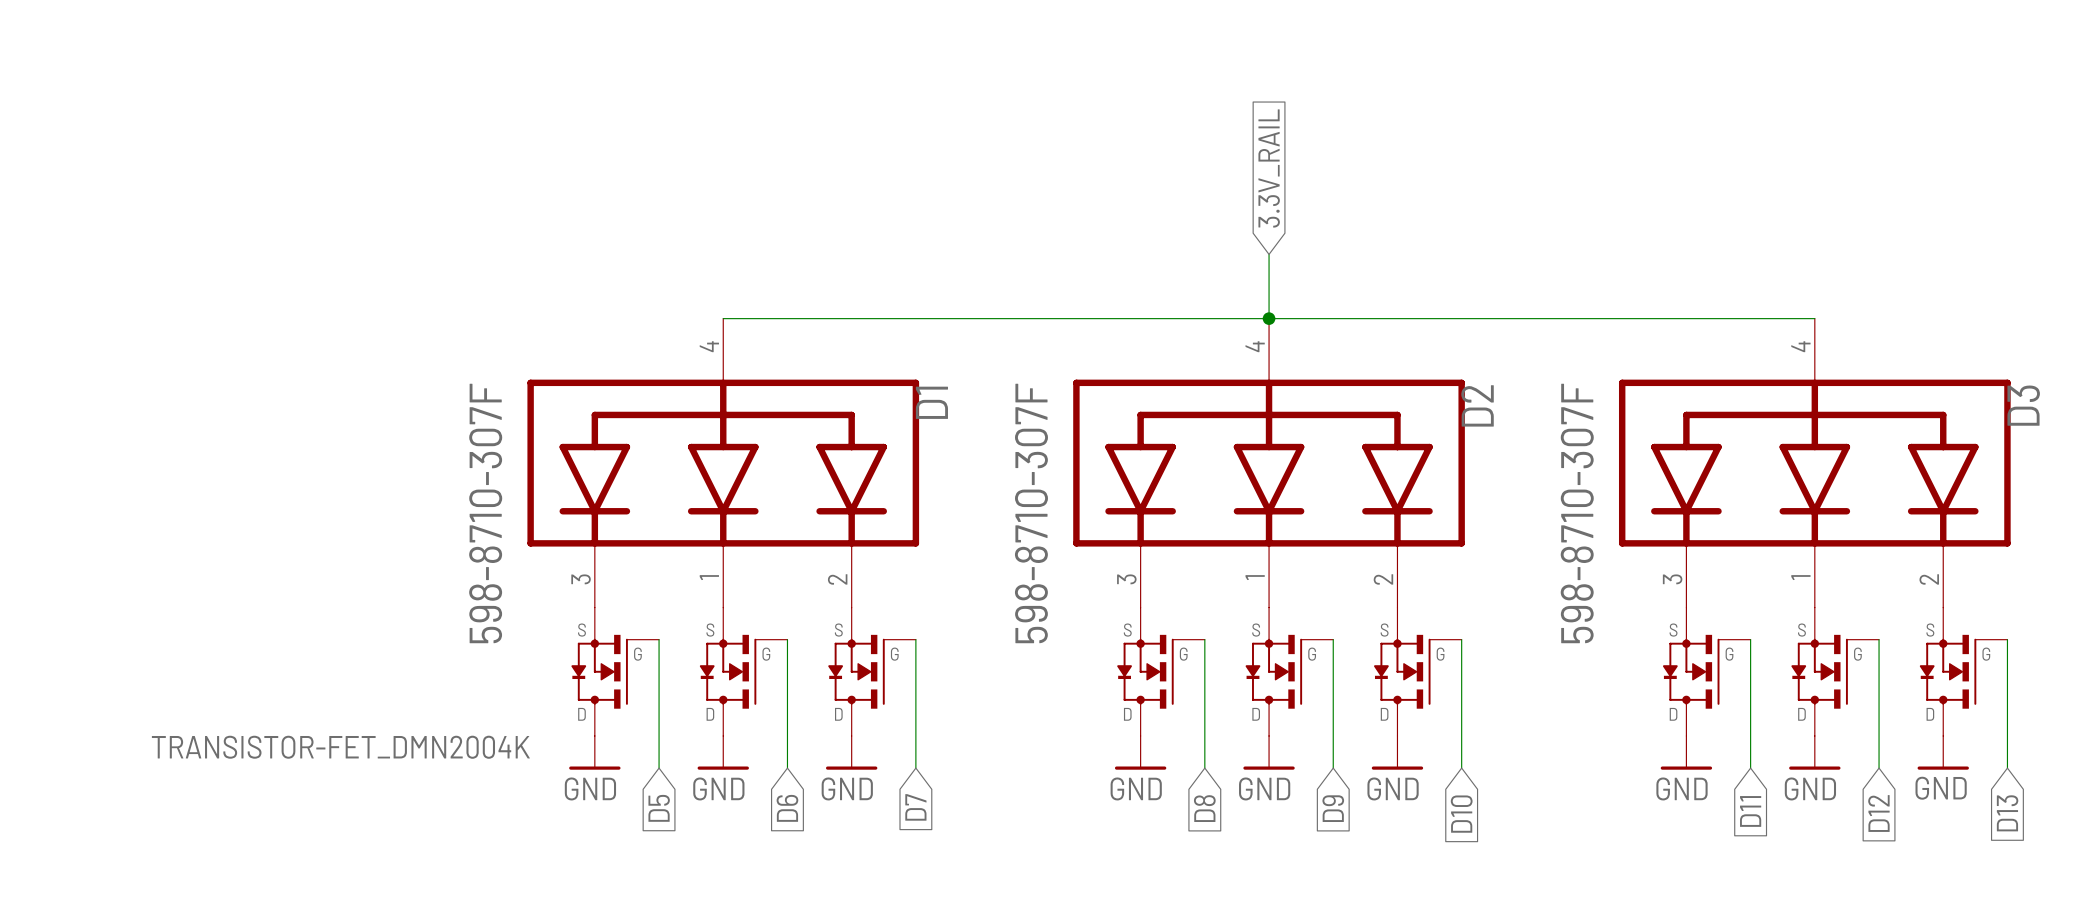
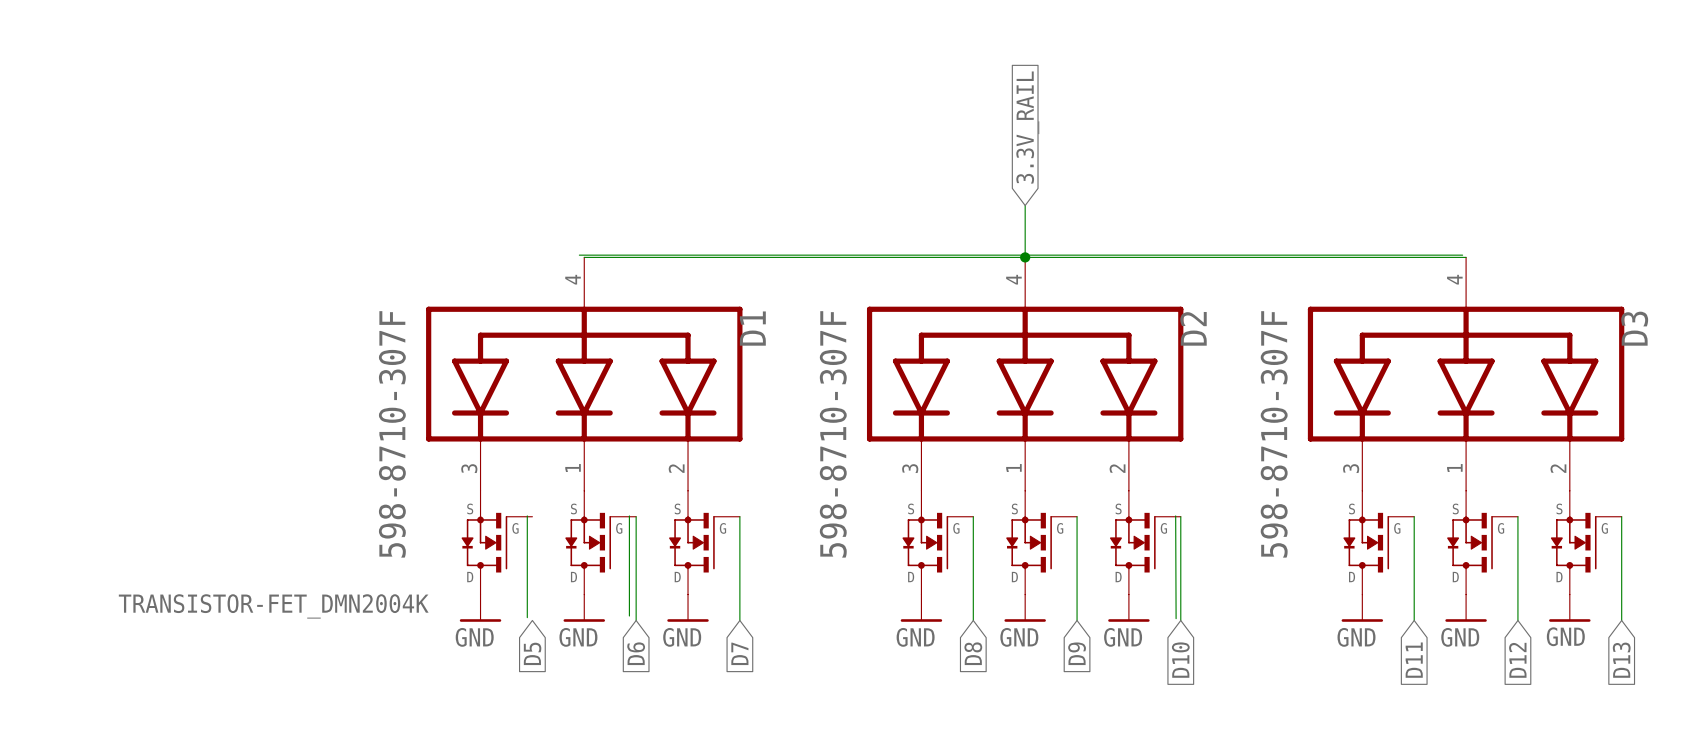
wire: none -> (579, 255) (1462, 255)
wire: none -> (527, 515) (527, 617)
wire: none -> (629, 515) (629, 616)
wire: none -> (1175, 515) (1176, 618)
wire: (659, 639) (659, 768) -> none

